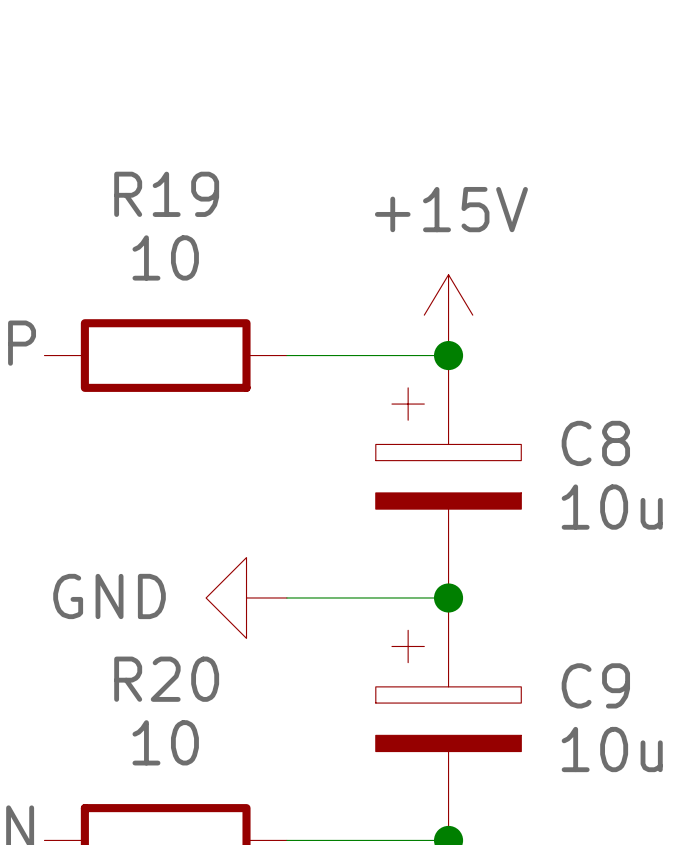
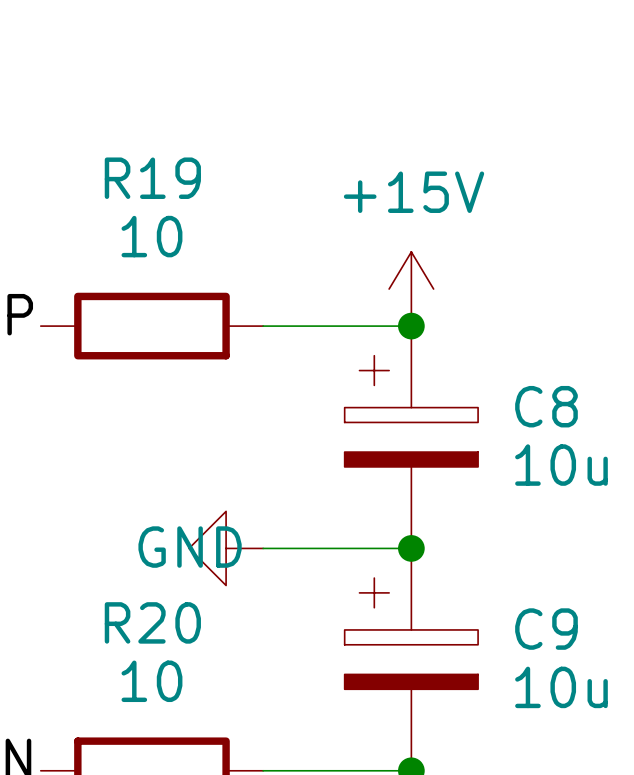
power symbol text position: GND (109, 596) -> GND (190, 547)

